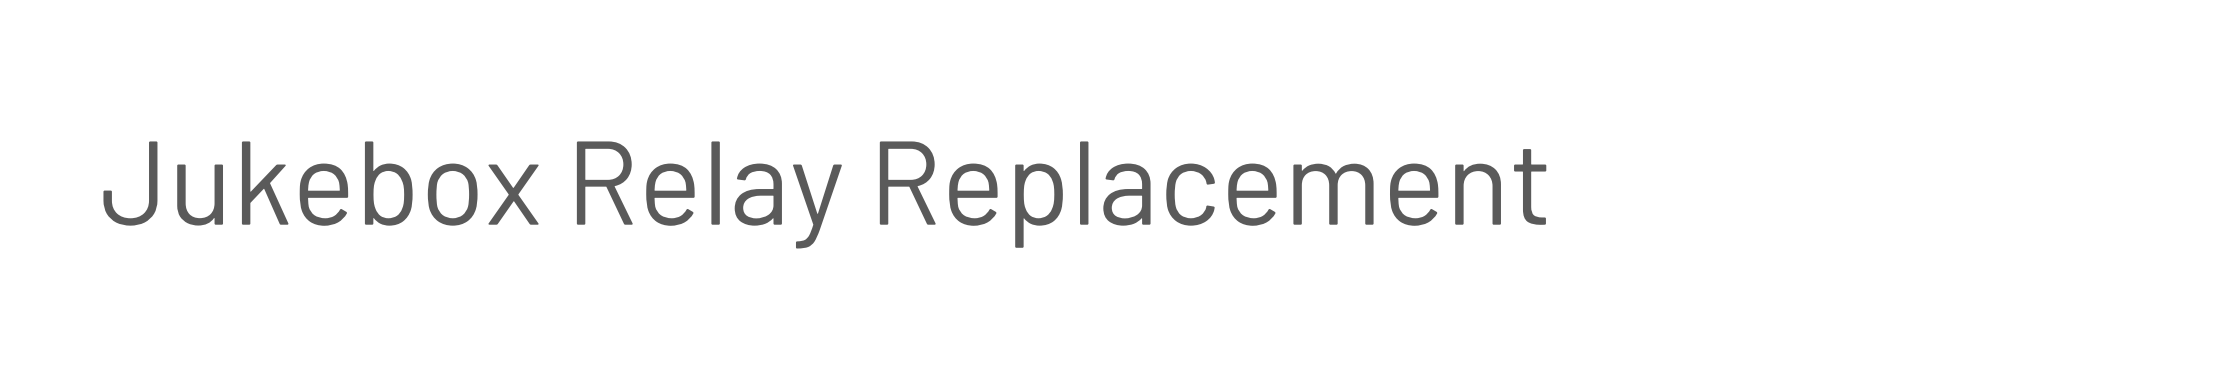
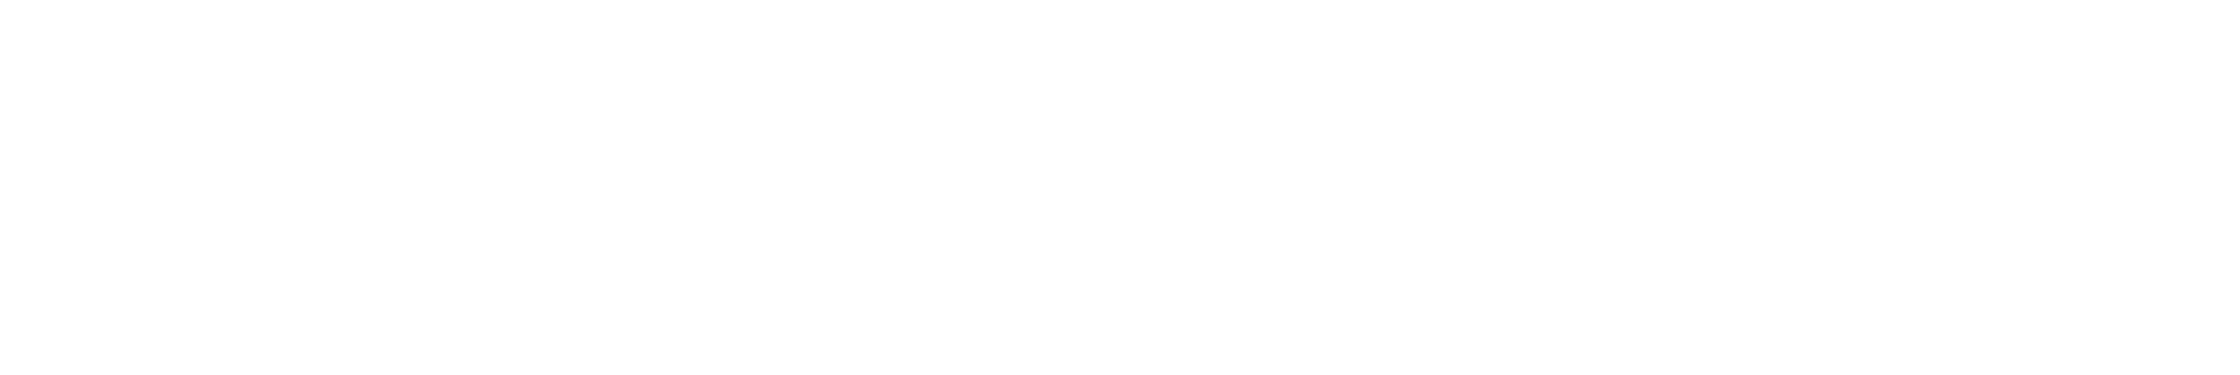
text: Jukebox Relay Replacement (824, 194) -> none

